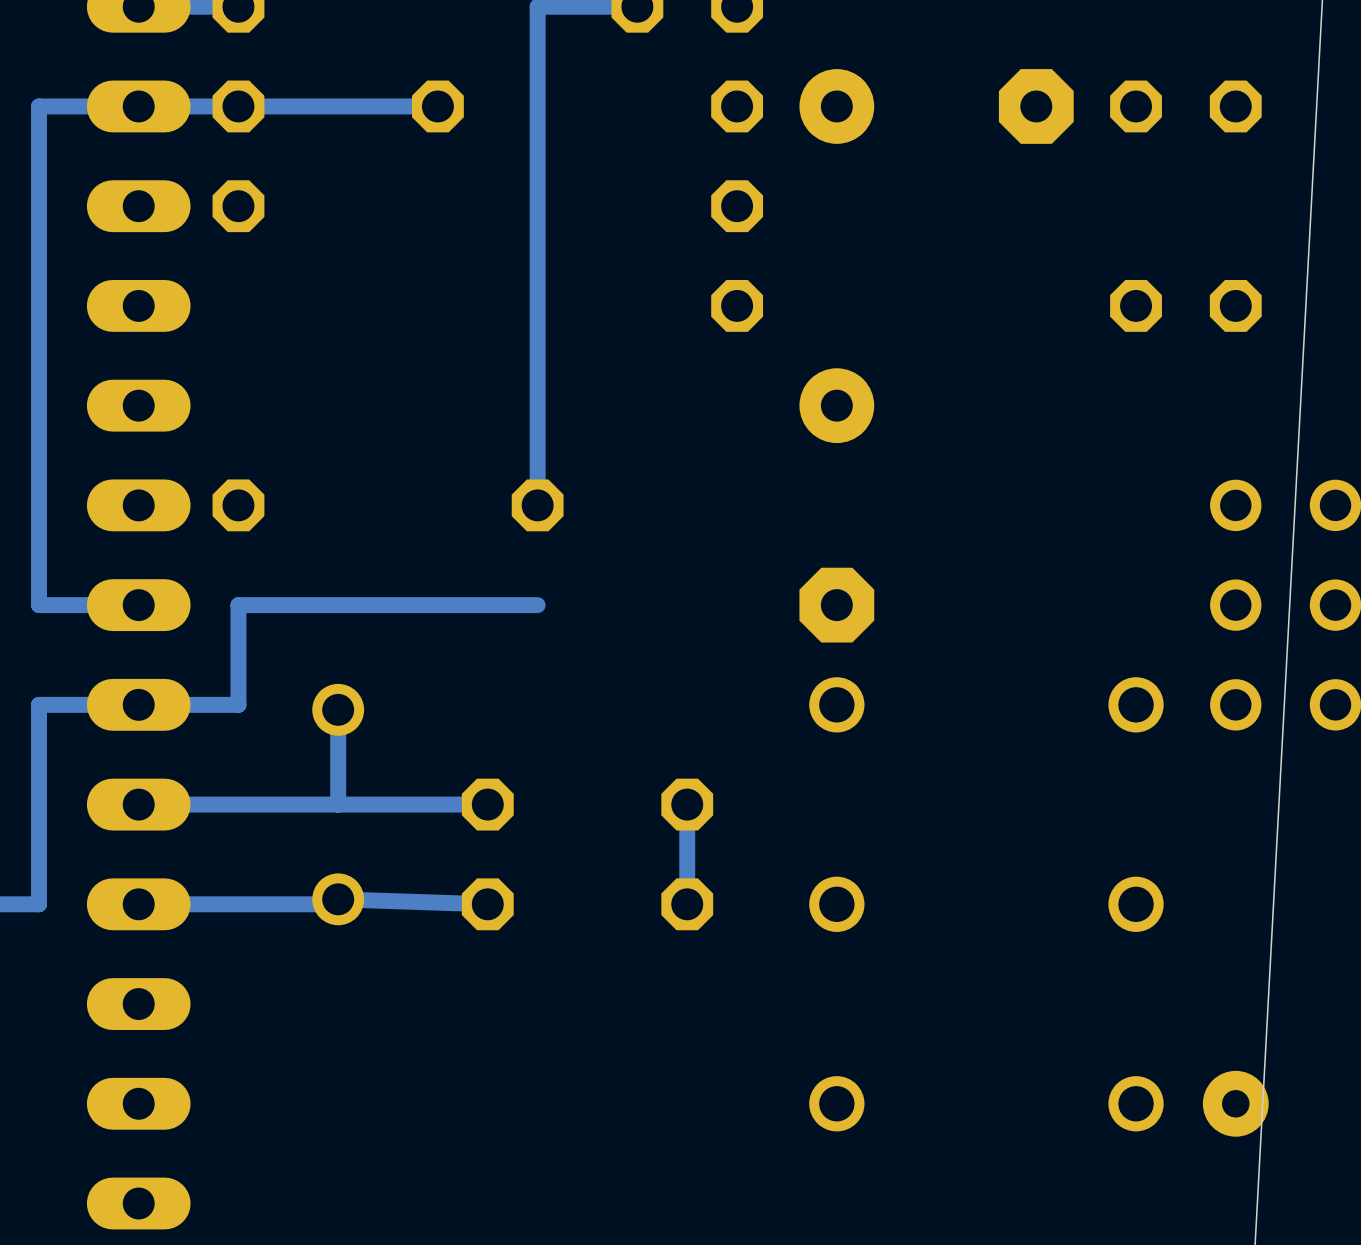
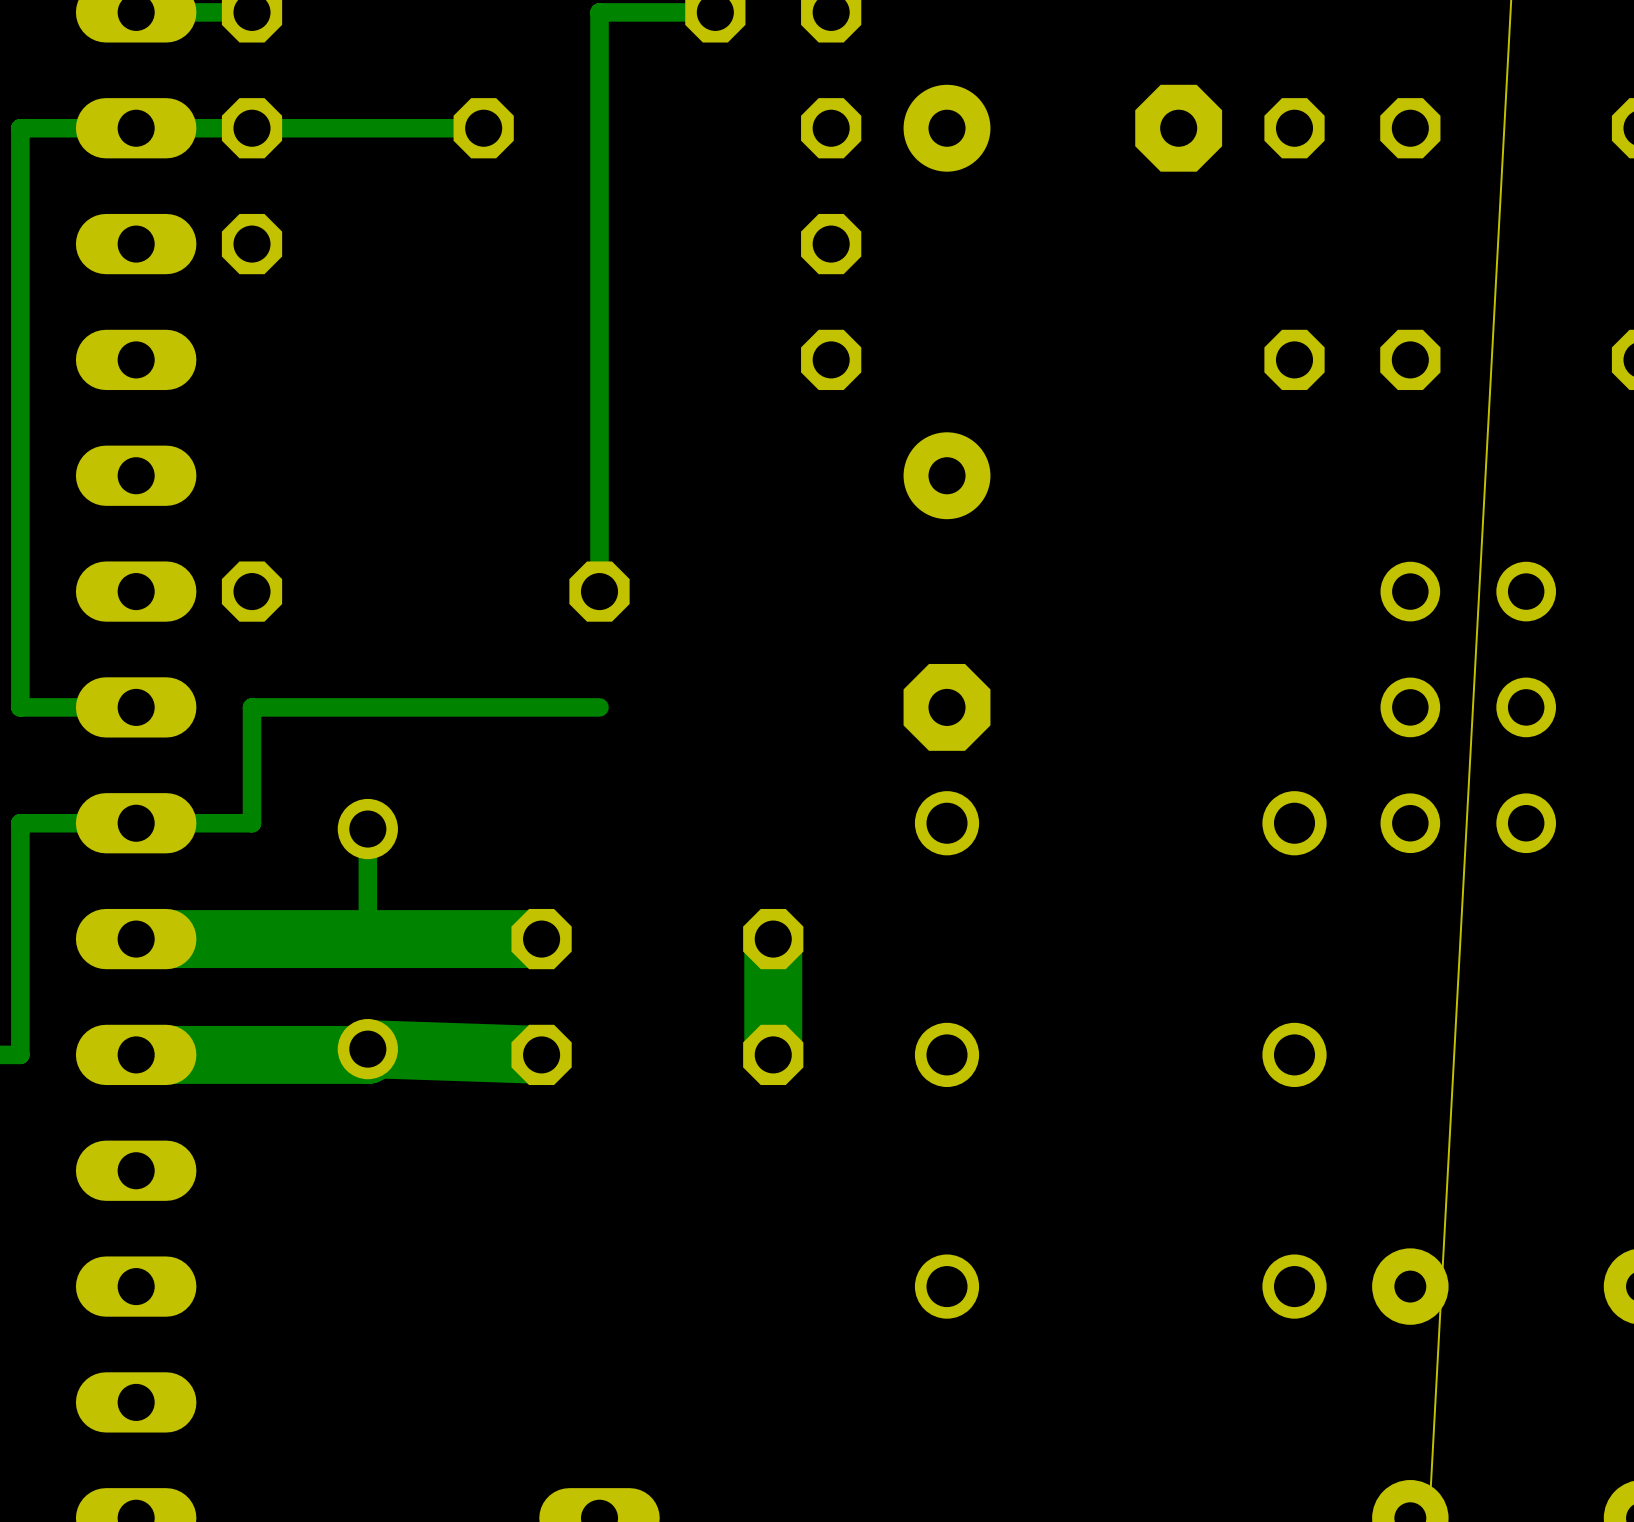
track width: thin (487, 804) (138, 804) -> thick (541, 939) (136, 939)
track width: thin (687, 804) (687, 904) -> thick (773, 939) (773, 1054)
track width: thin (487, 904) (338, 899) (338, 904) (138, 904) -> thick (541, 1054) (367, 1049) (367, 1054) (136, 1054)

